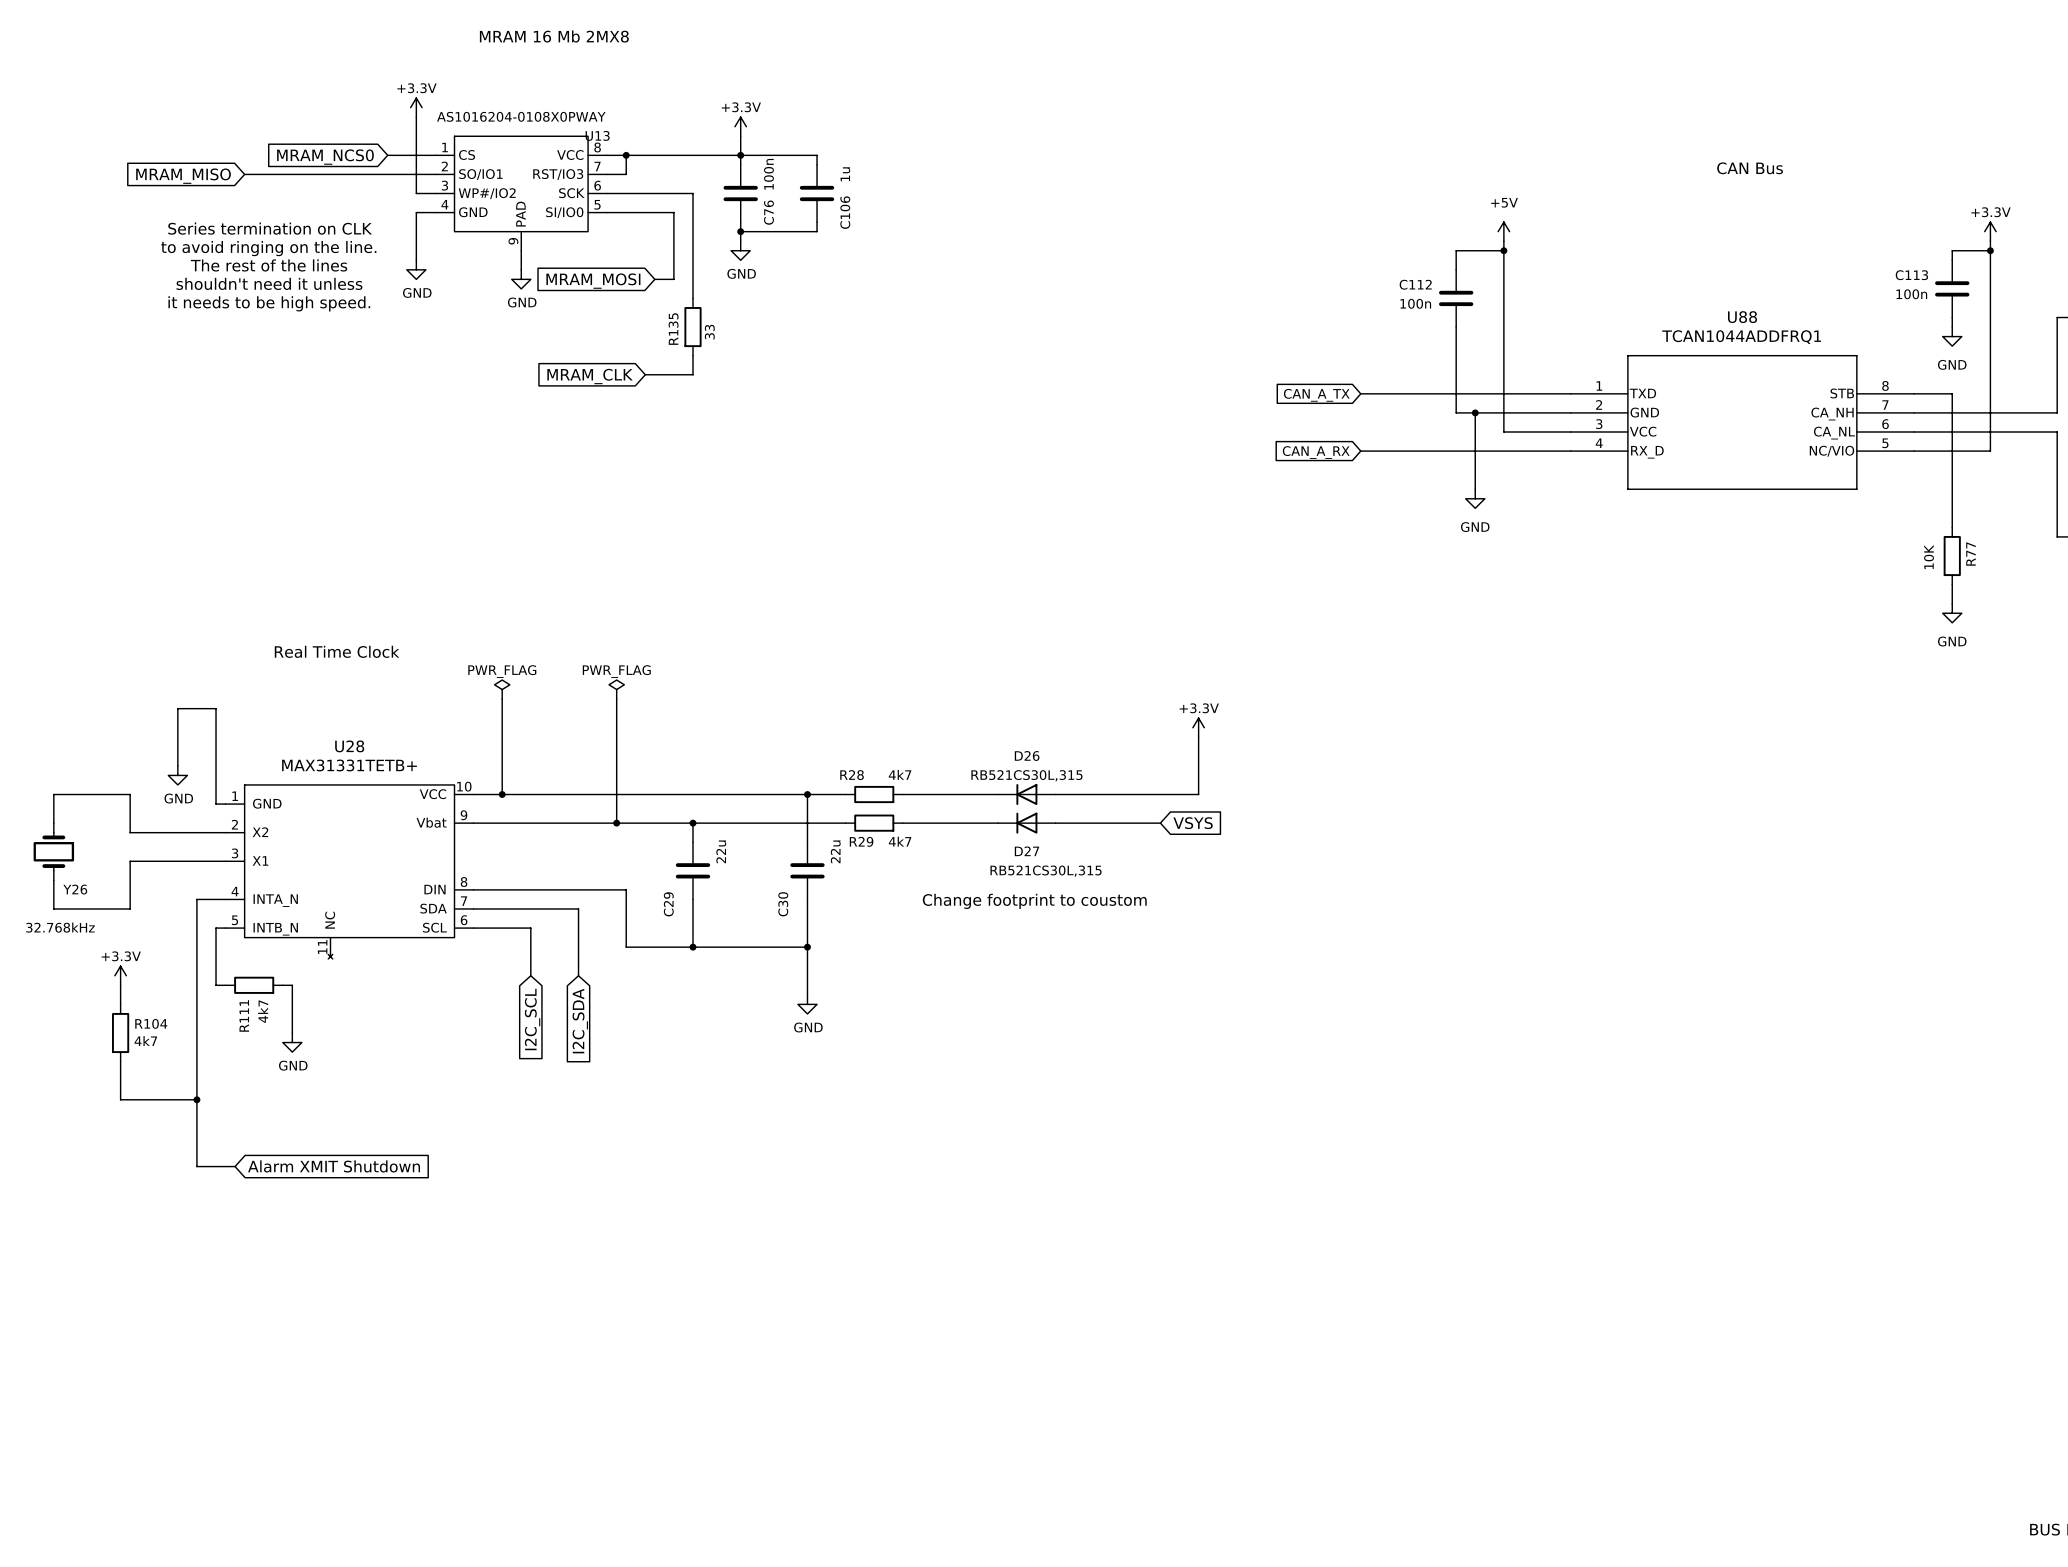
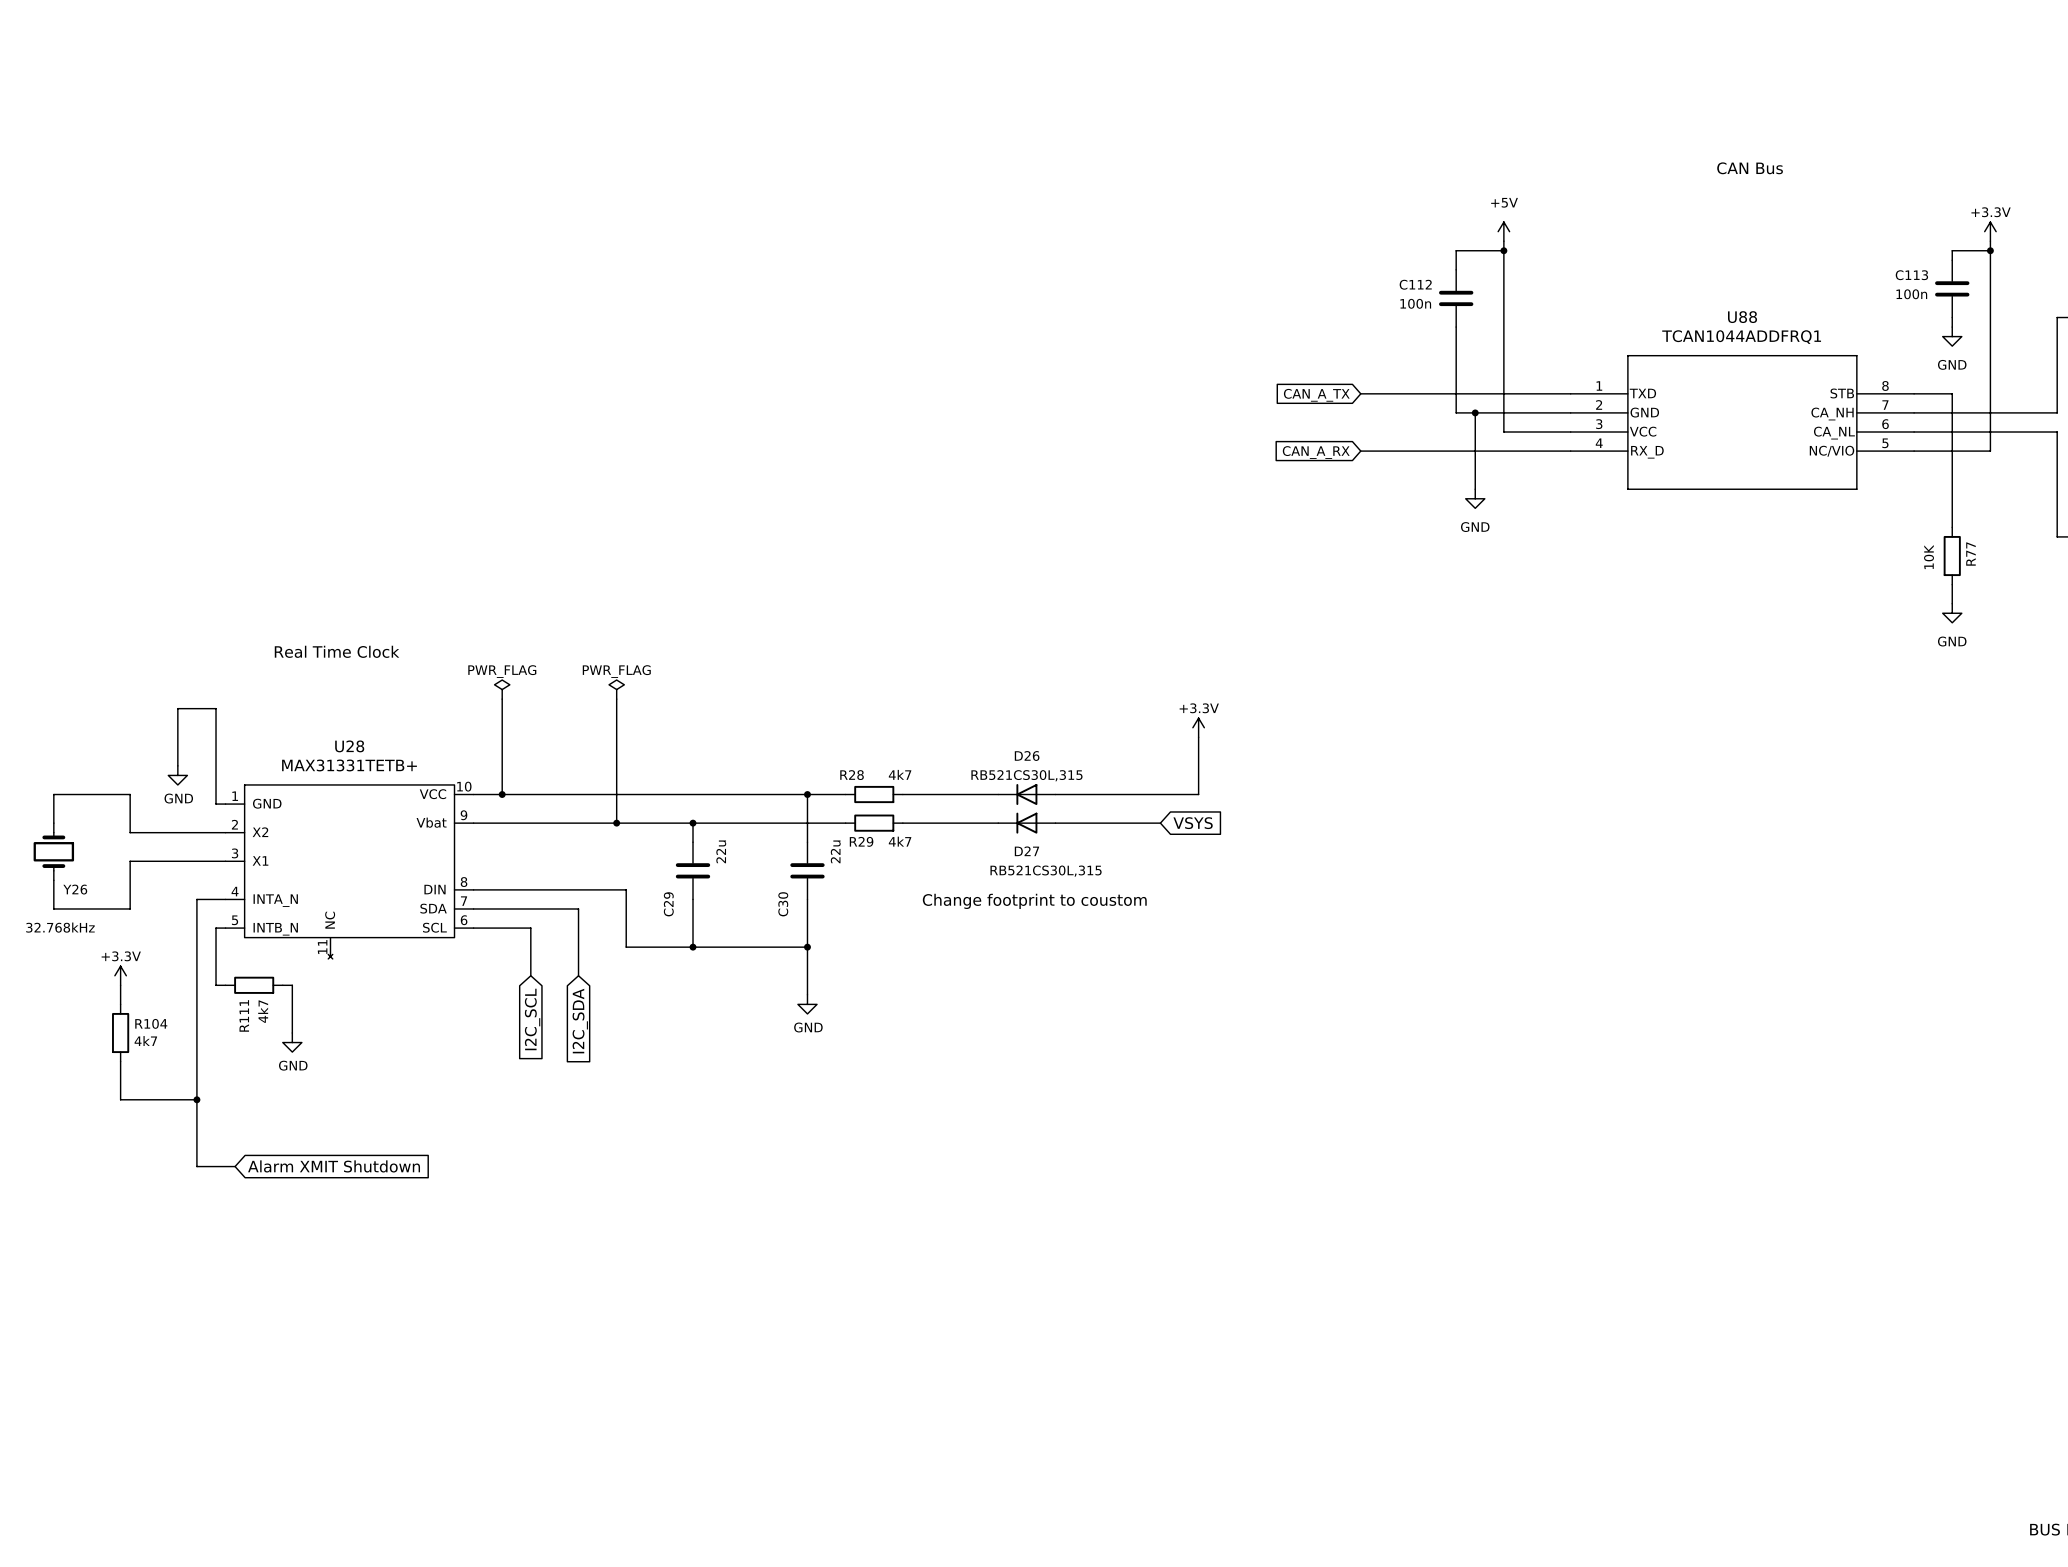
text: MRAM 16 Mb 2MX8 (554, 36) -> none
power symbol: +3.3V (416, 107) -> none
wire: (416, 117) (416, 193) (435, 193) -> none
power symbol: +3.3V (740, 126) -> none
wire: (740, 136) (740, 164) -> none
wire: (387, 155) (435, 155) -> none
wire: (607, 155) (817, 155) (817, 164) -> none
wire: (626, 155) (626, 174) (607, 174) -> none
junction: (626, 155) -> none
junction: (740, 155) -> none
global label: MRAM_NCS0 (325, 157) -> none
wire: (244, 174) (435, 174) -> none
global label: MRAM_MISO (183, 176) -> none
U13: AS1016204-0108X0PWAY (521, 193) -> none
wire: (607, 193) (693, 193) (693, 298) -> none
C76: 100n (740, 193) -> none
C106: 1u (817, 193) -> none
wire: (435, 212) (416, 212) (416, 260) -> none
wire: (607, 212) (673, 212) (673, 279) (654, 279) -> none
wire: (740, 222) (740, 241) -> none
wire: (817, 222) (817, 231) (740, 231) -> none
text: Series termination on CLK (270, 228) -> none
junction: (740, 231) -> none
text: to avoid ringing on the line. (268, 248) -> none
wire: (521, 250) (521, 269) -> none
power symbol: GND (740, 250) -> none
text: The rest of the lines (269, 265) -> none
power symbol: GND (416, 269) -> none
power symbol: GND (521, 279) -> none
global label: MRAM_MOSI (593, 281) -> none
text: shouldn't need it unless (269, 283) -> none
text: it needs to be high speed. (269, 303) -> none
R135: 33 (693, 327) -> none
wire: (693, 355) (693, 374) (645, 374) -> none
global label: MRAM_CLK (590, 376) -> none

